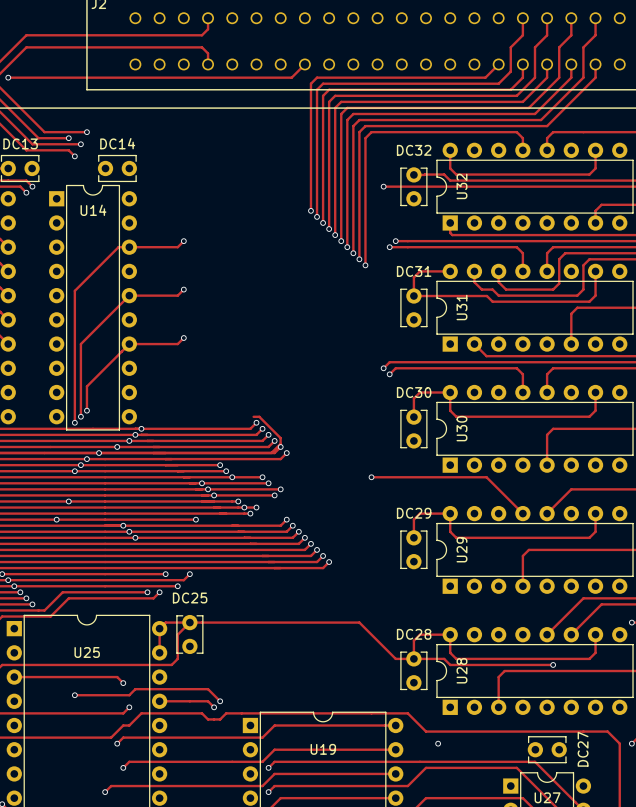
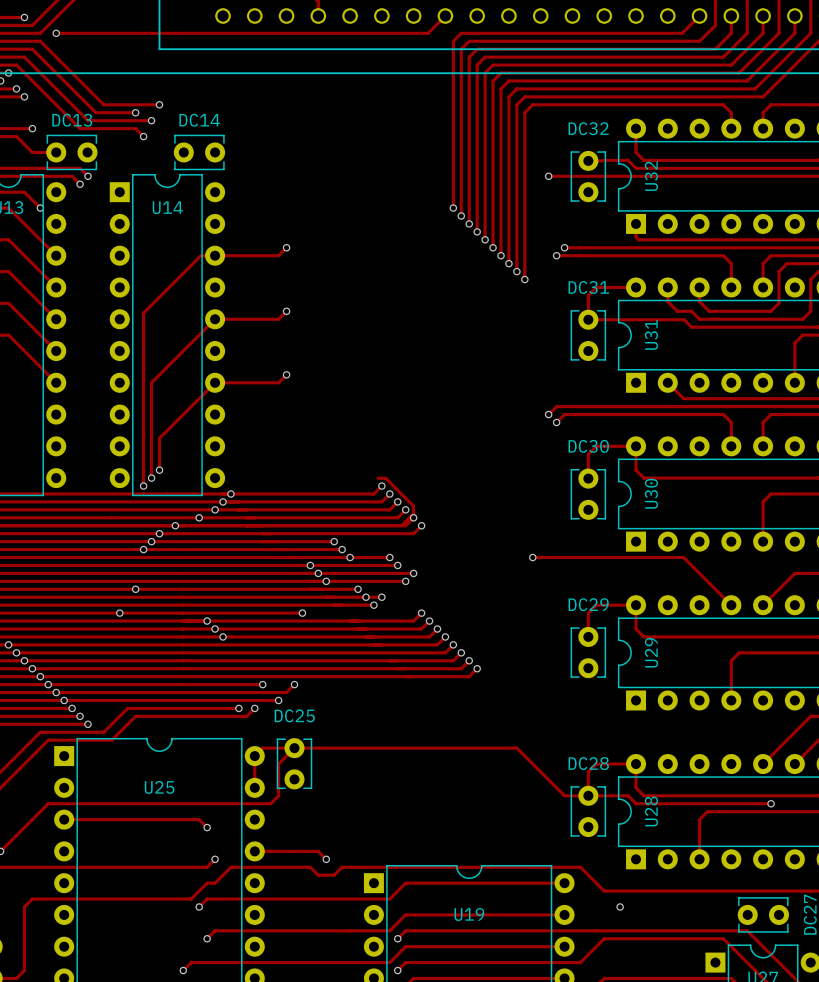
track: (74, 695) (129, 695) (135, 689) (208, 689) (220, 701) -> none
via: (74, 695) -> none
via: (220, 701) -> none

